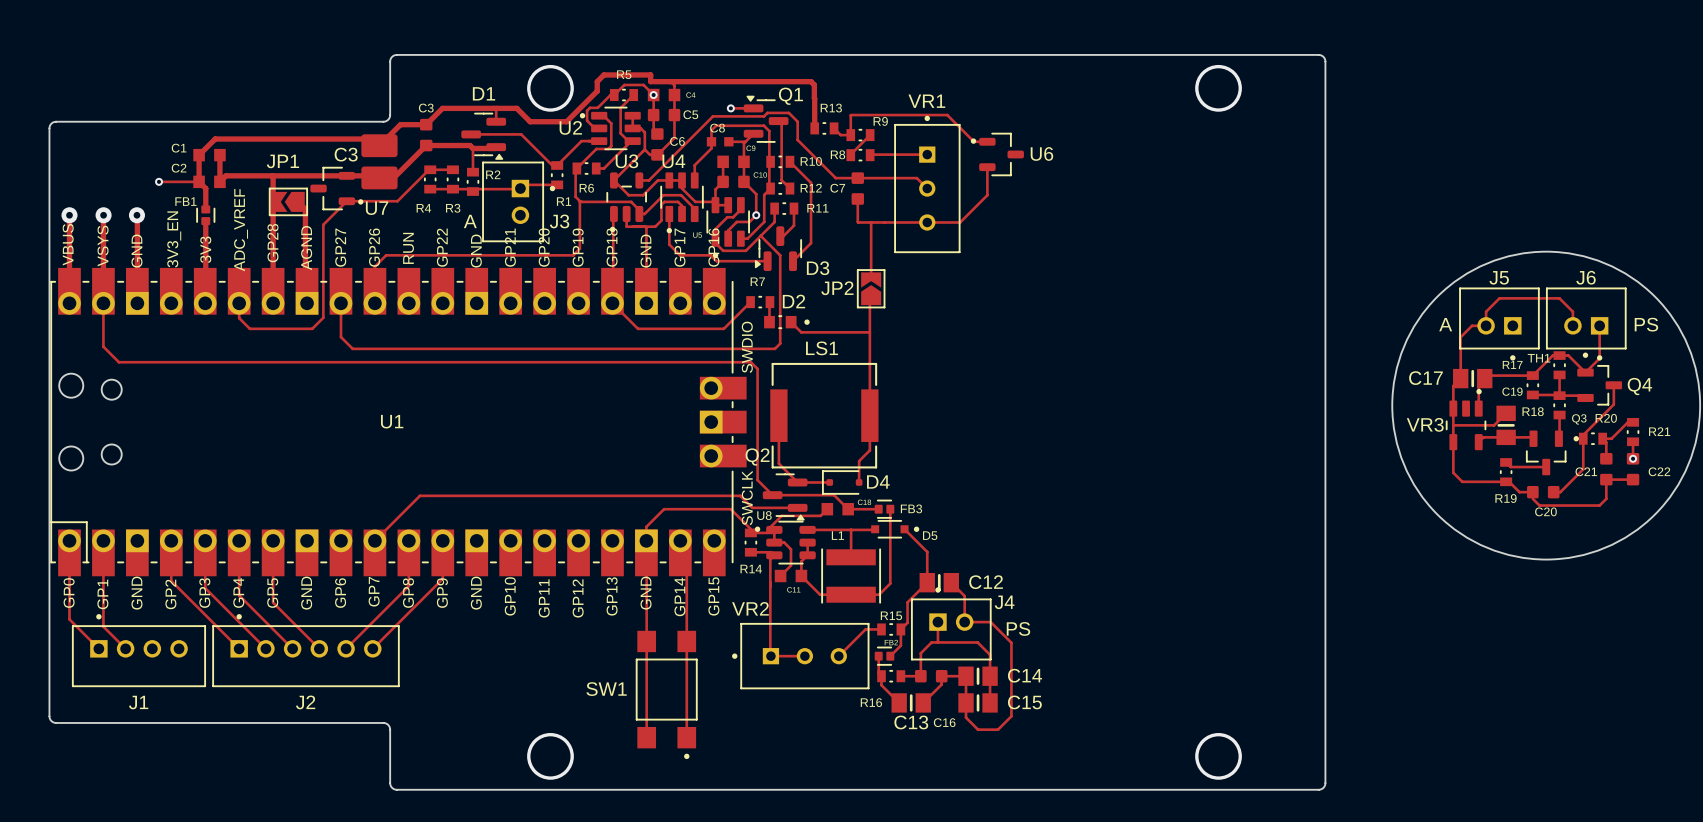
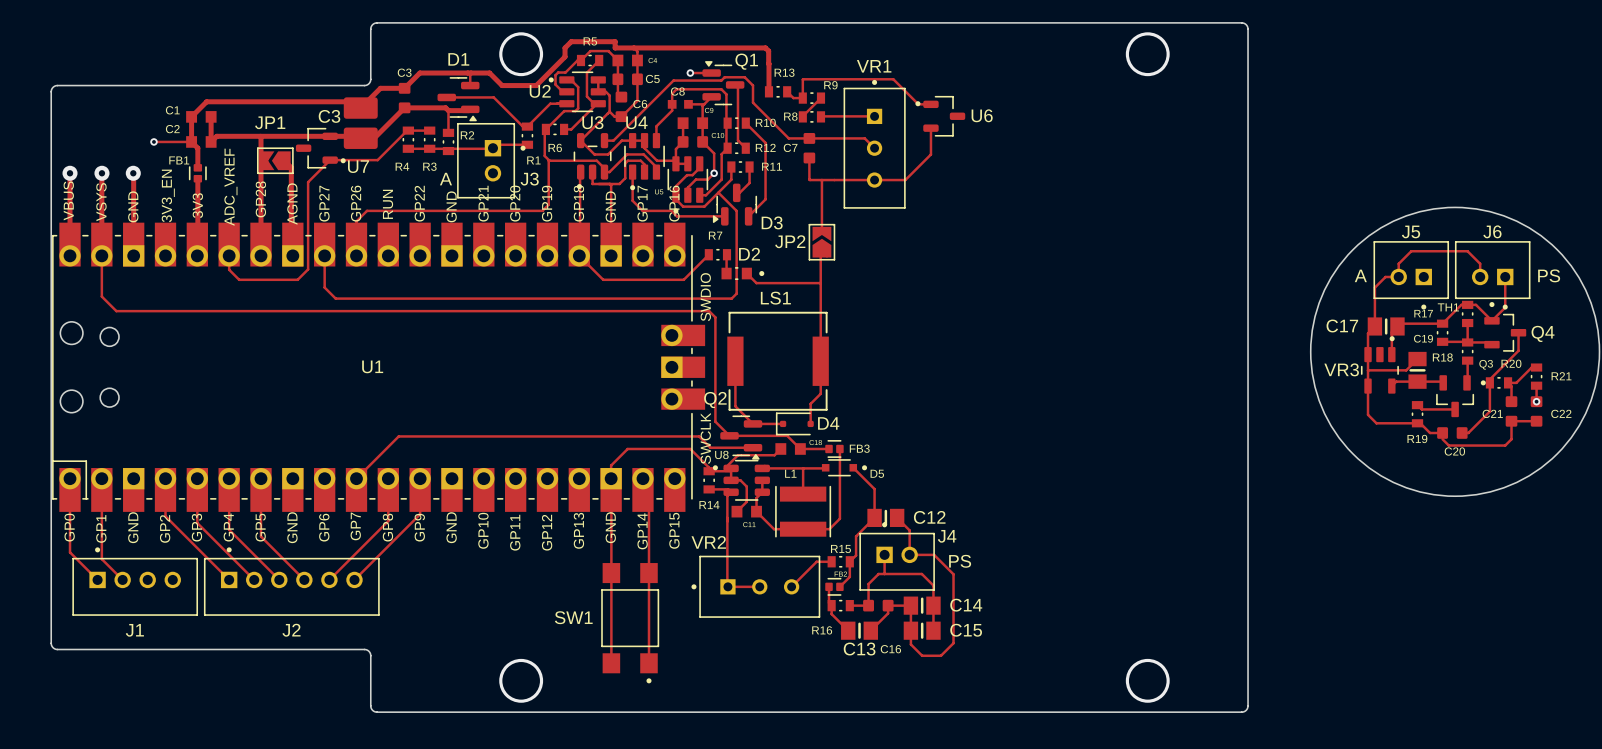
via: (653, 95) -> none

